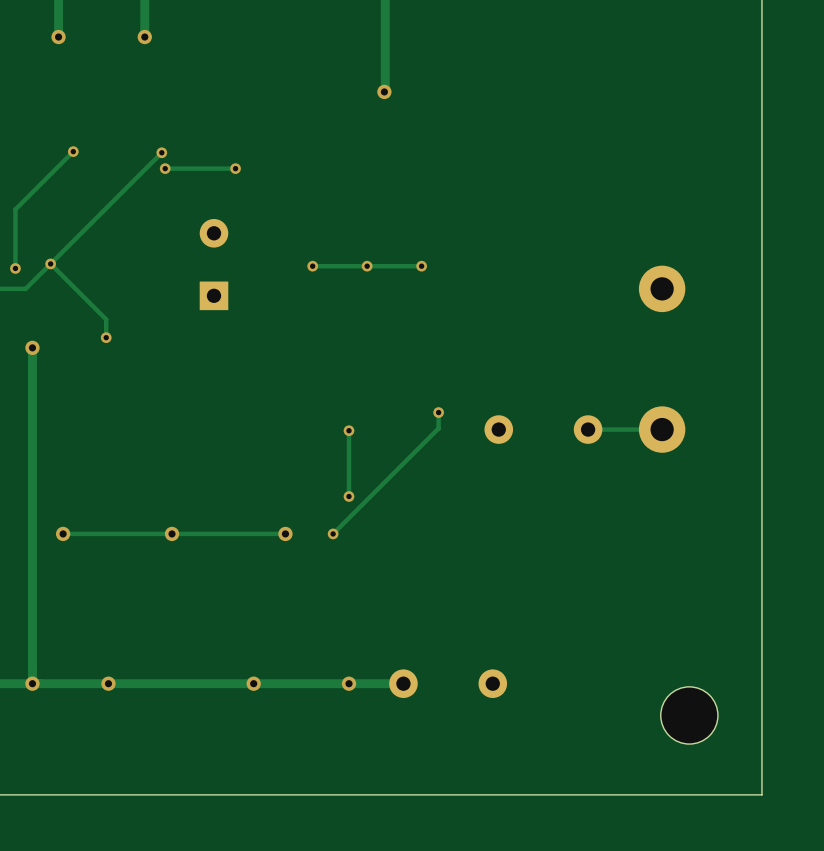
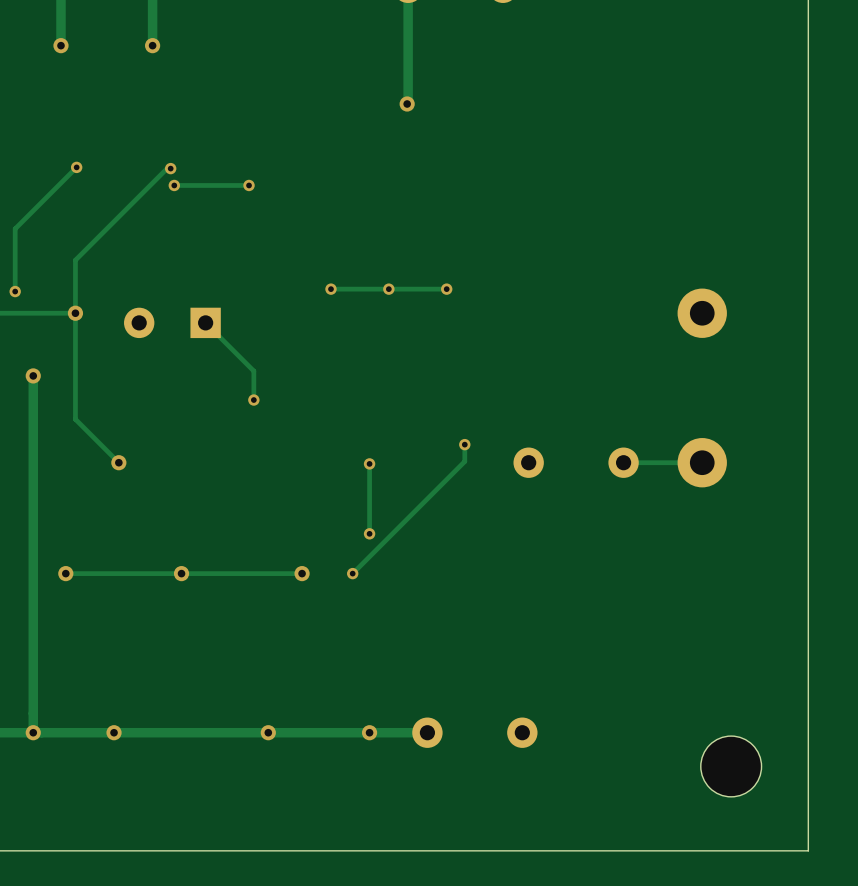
track: none -> (169, 166) (75, 260) (75, 419) (118, 462)
track: (161, 152) (25, 288) -> (75, 313) (26, 313)
track: (50, 263) (106, 319) (106, 337) -> none
via: (50, 263) -> none
part rotation: 0° (213, 264) -> 90° counterclockwise (172, 322)
part position: (213, 264) -> (172, 322)
via: none -> (75, 313)
track: none -> (205, 322) (253, 371) (253, 400)
via: (106, 337) -> none
via: none -> (253, 400)
via: none -> (118, 462)

